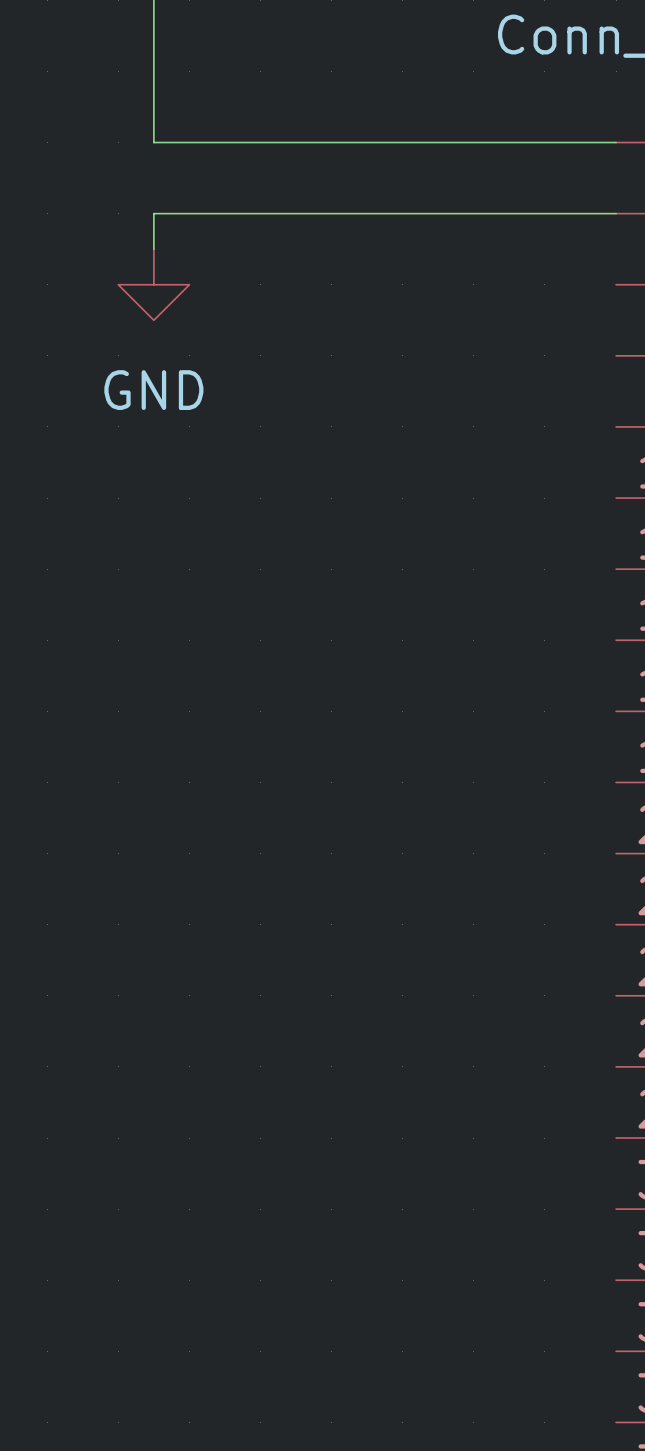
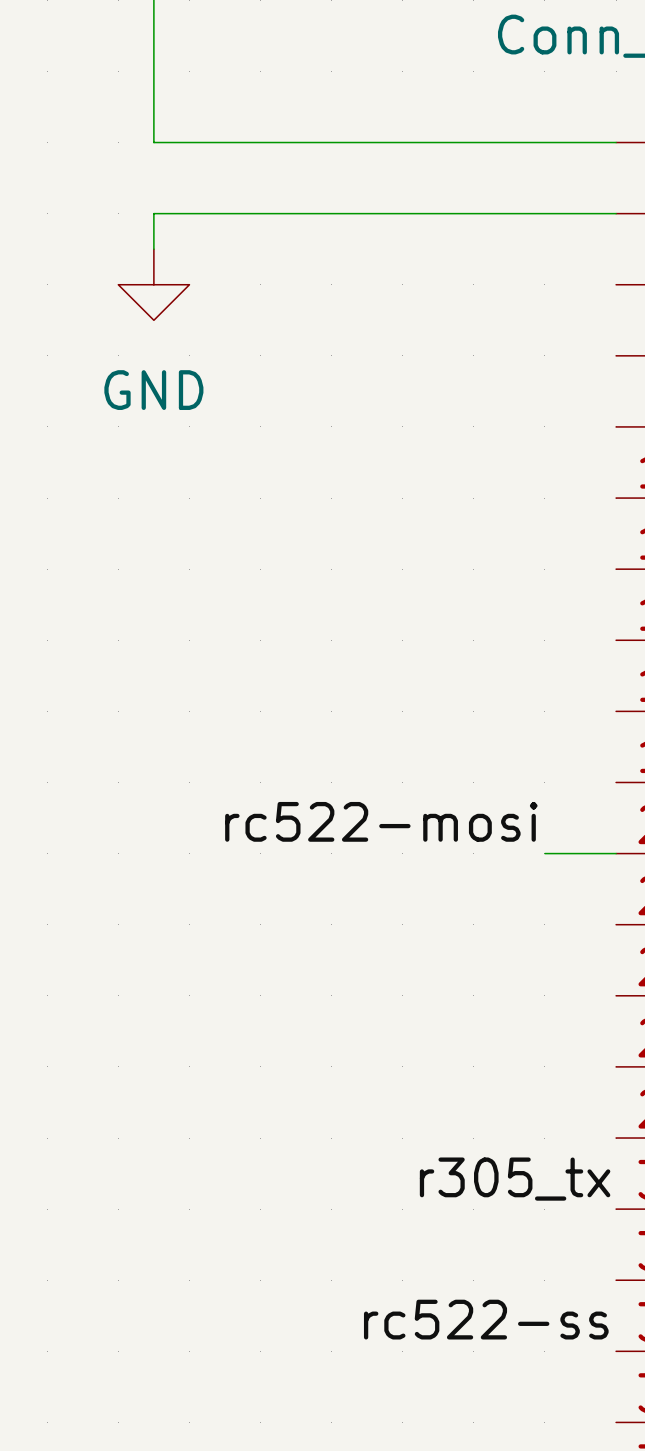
label: none -> rc522-mosi (381, 821)
wire: none -> (544, 853) (616, 853)
label: none -> r305_tx (515, 1179)
label: none -> rc522-ss (486, 1319)

